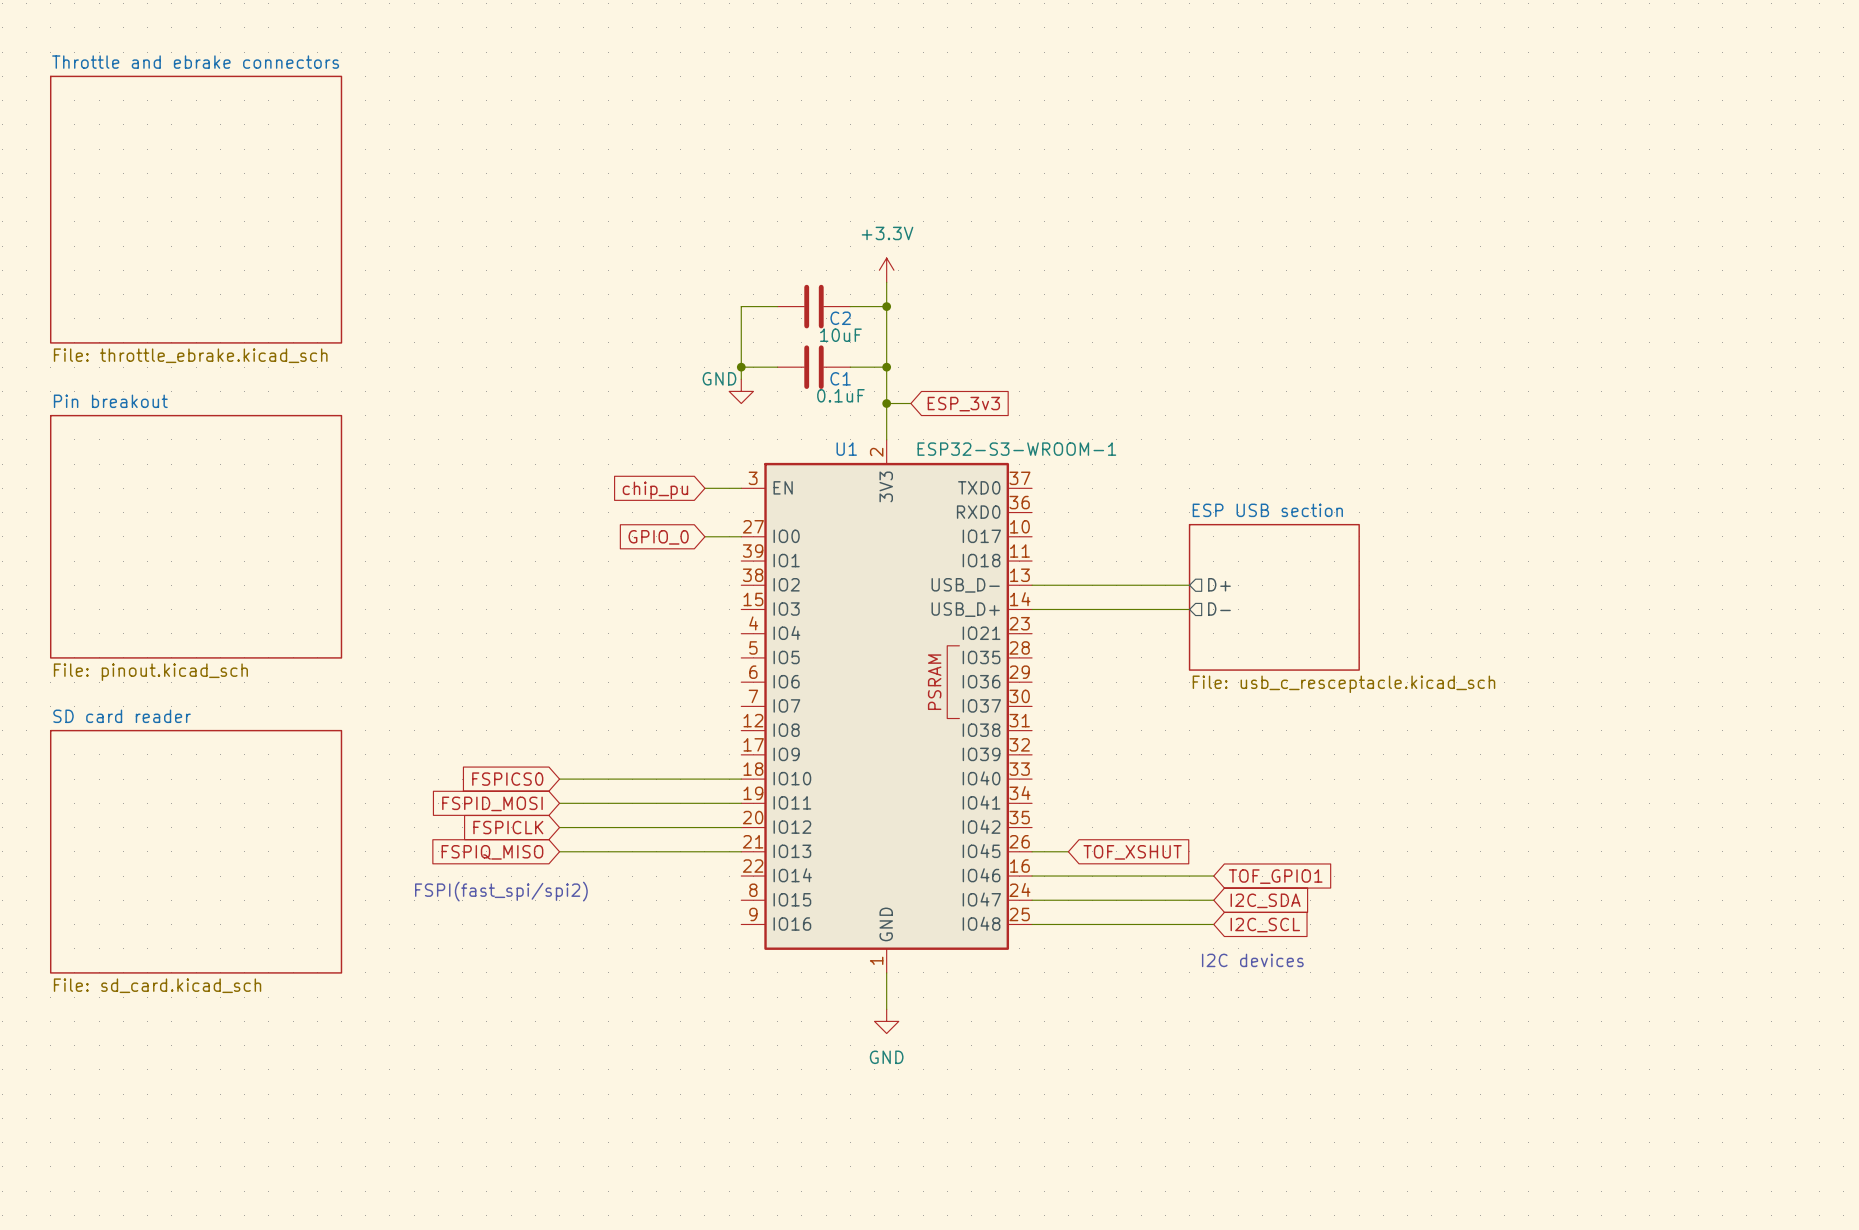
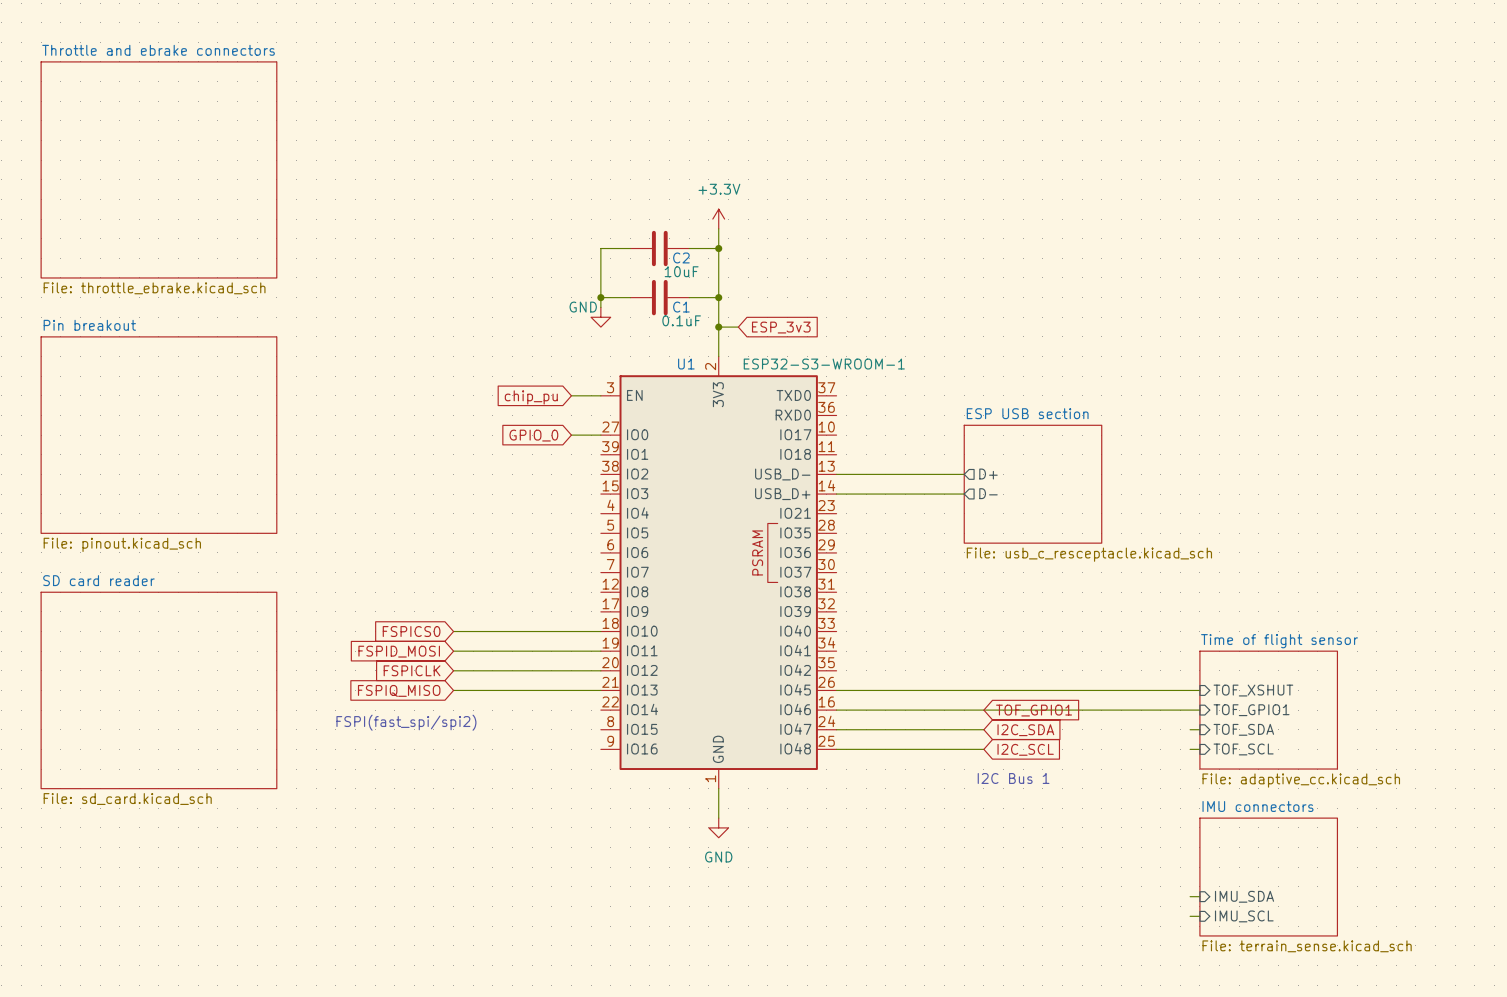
wire: none -> (866, 690) (1199, 690)
sheet pin: none -> TOF_XSHUT (1253, 690)
global label: TOF_XSHUT (1132, 852) -> none
wire: none -> (983, 710) (1199, 710)
sheet pin: none -> TOF_GPIO1 (1251, 710)
sheet Time of flight sensor: none -> File: adaptive_cc.kicad_sch (1268, 710)
wire: none -> (1190, 729) (1199, 729)
sheet pin: none -> TOF_SDA (1243, 729)
wire: none -> (1190, 749) (1199, 749)
sheet pin: none -> TOF_SCL (1243, 749)
text: I2C devices (1252, 960) -> I2C Bus 1 (1013, 778)
sheet IMU connectors: none -> File: terrain_sense.kicad_sch (1268, 877)
wire: none -> (1190, 896) (1199, 896)
sheet pin: none -> IMU_SDA (1244, 896)
wire: none -> (1190, 916) (1199, 916)
sheet pin: none -> IMU_SCL (1244, 916)

